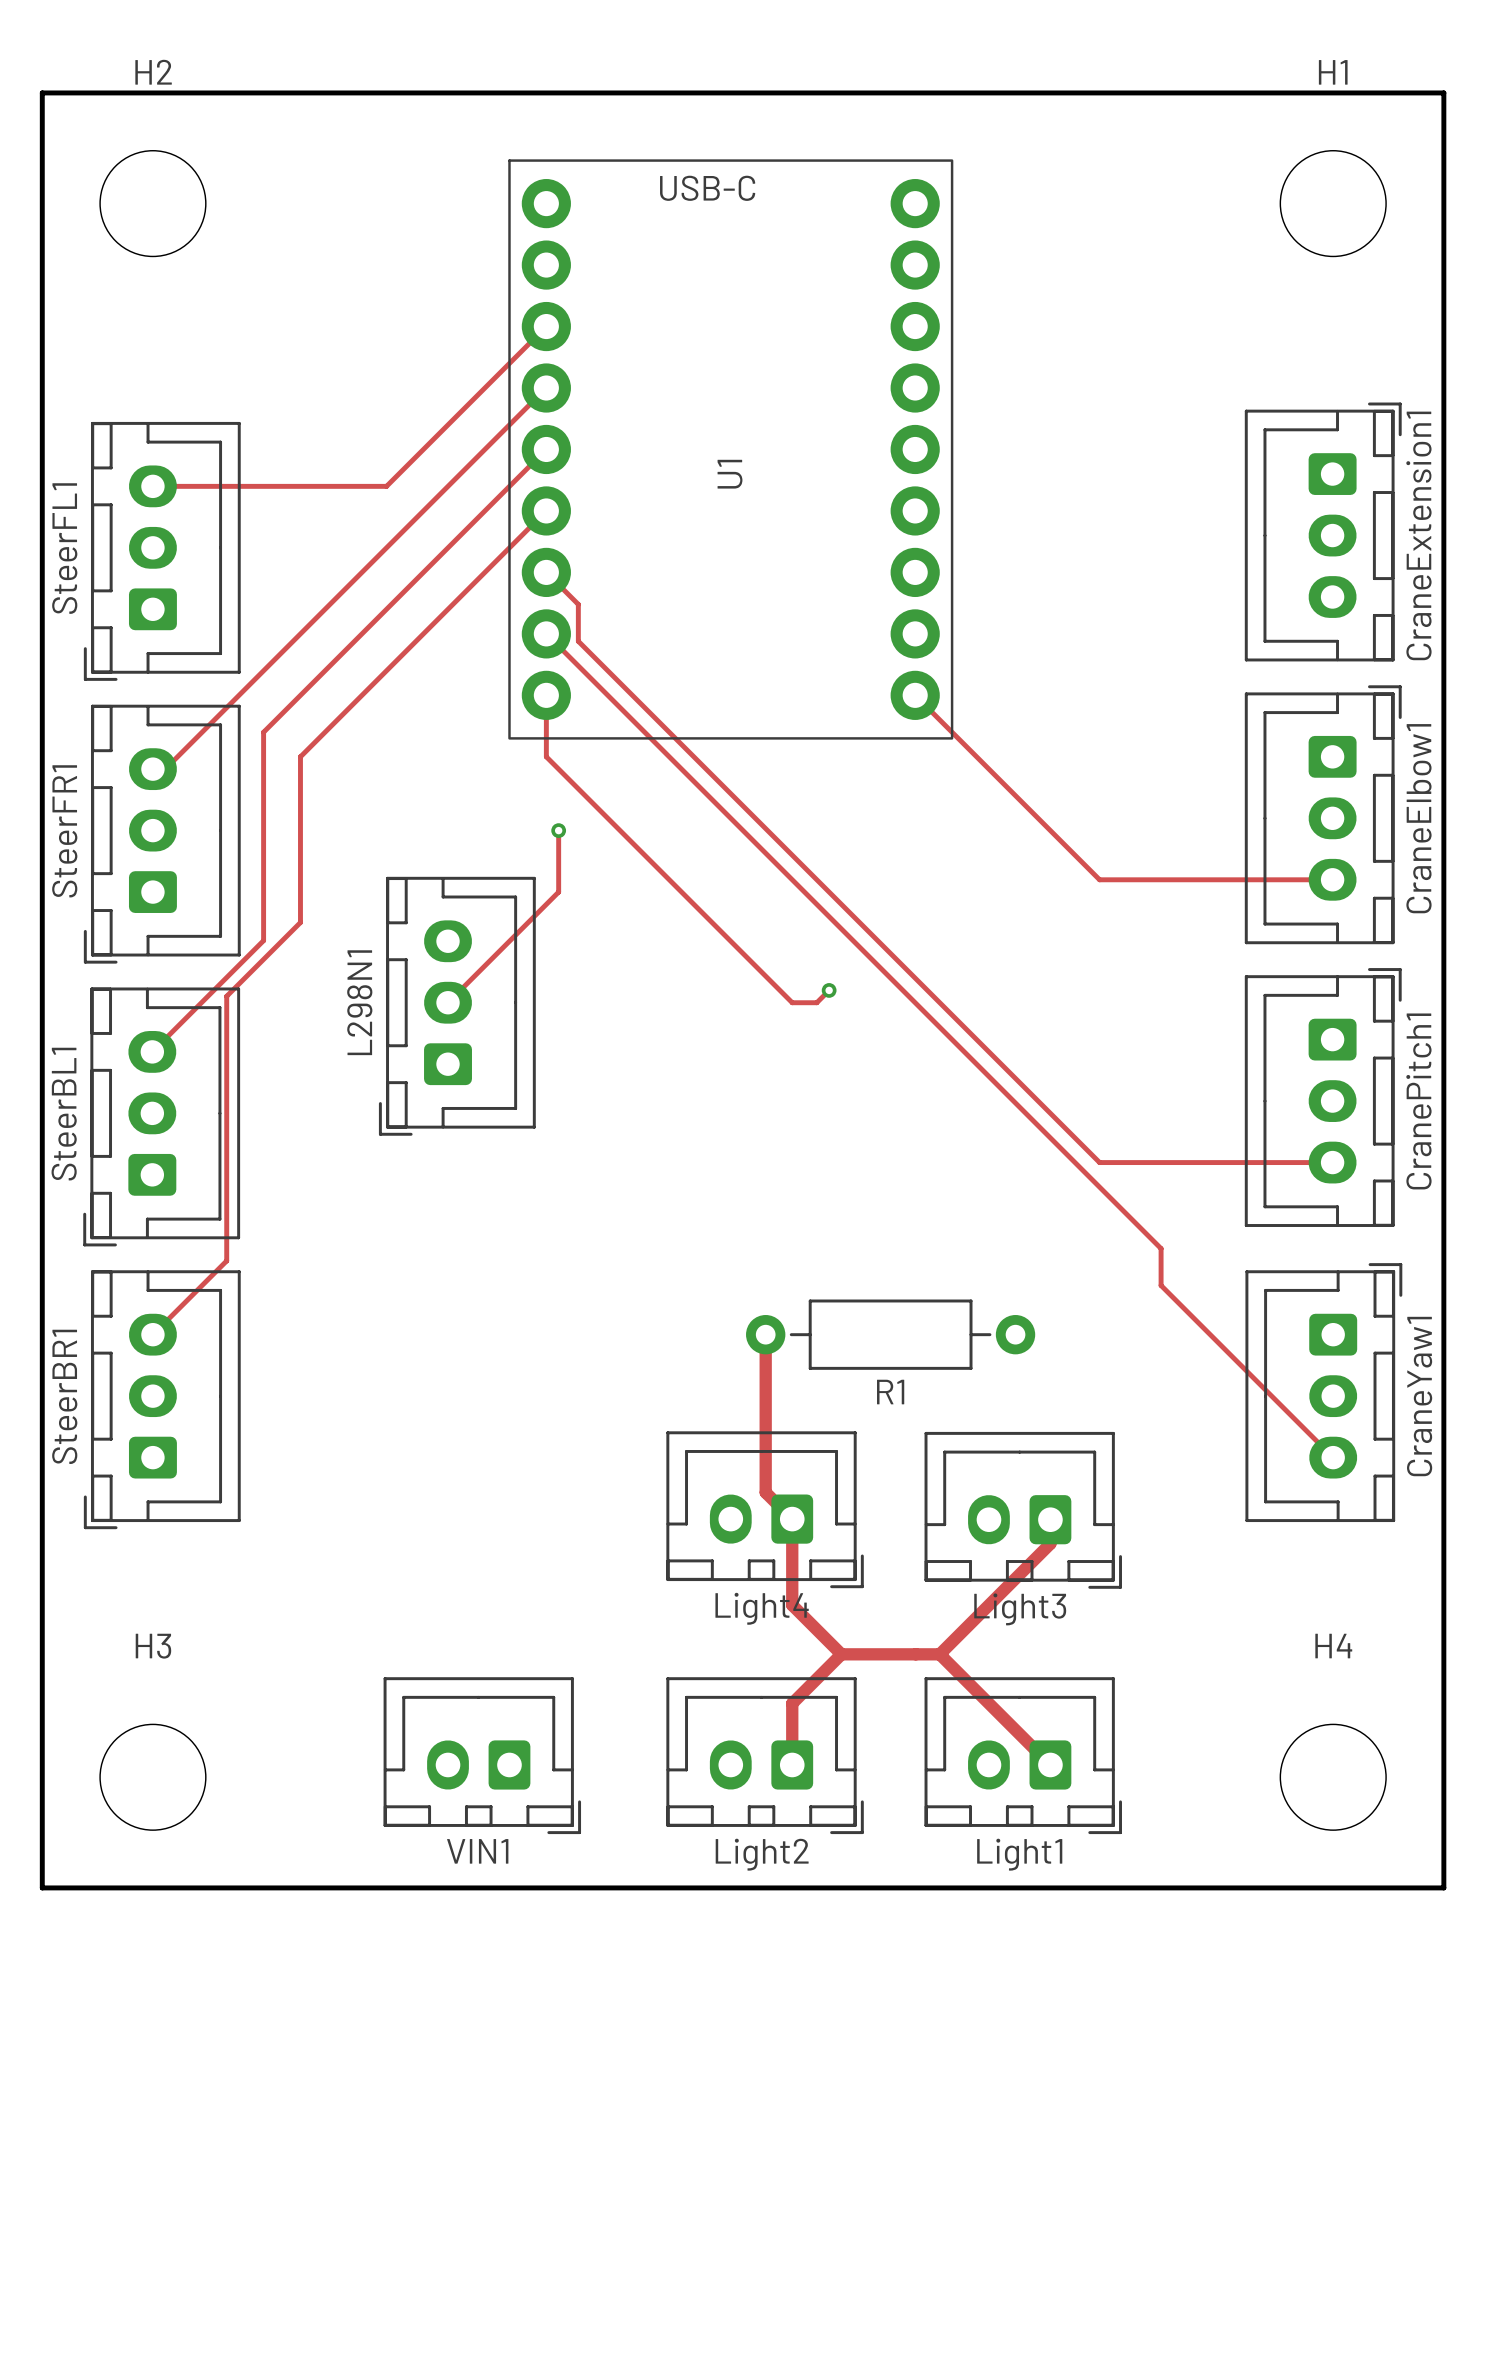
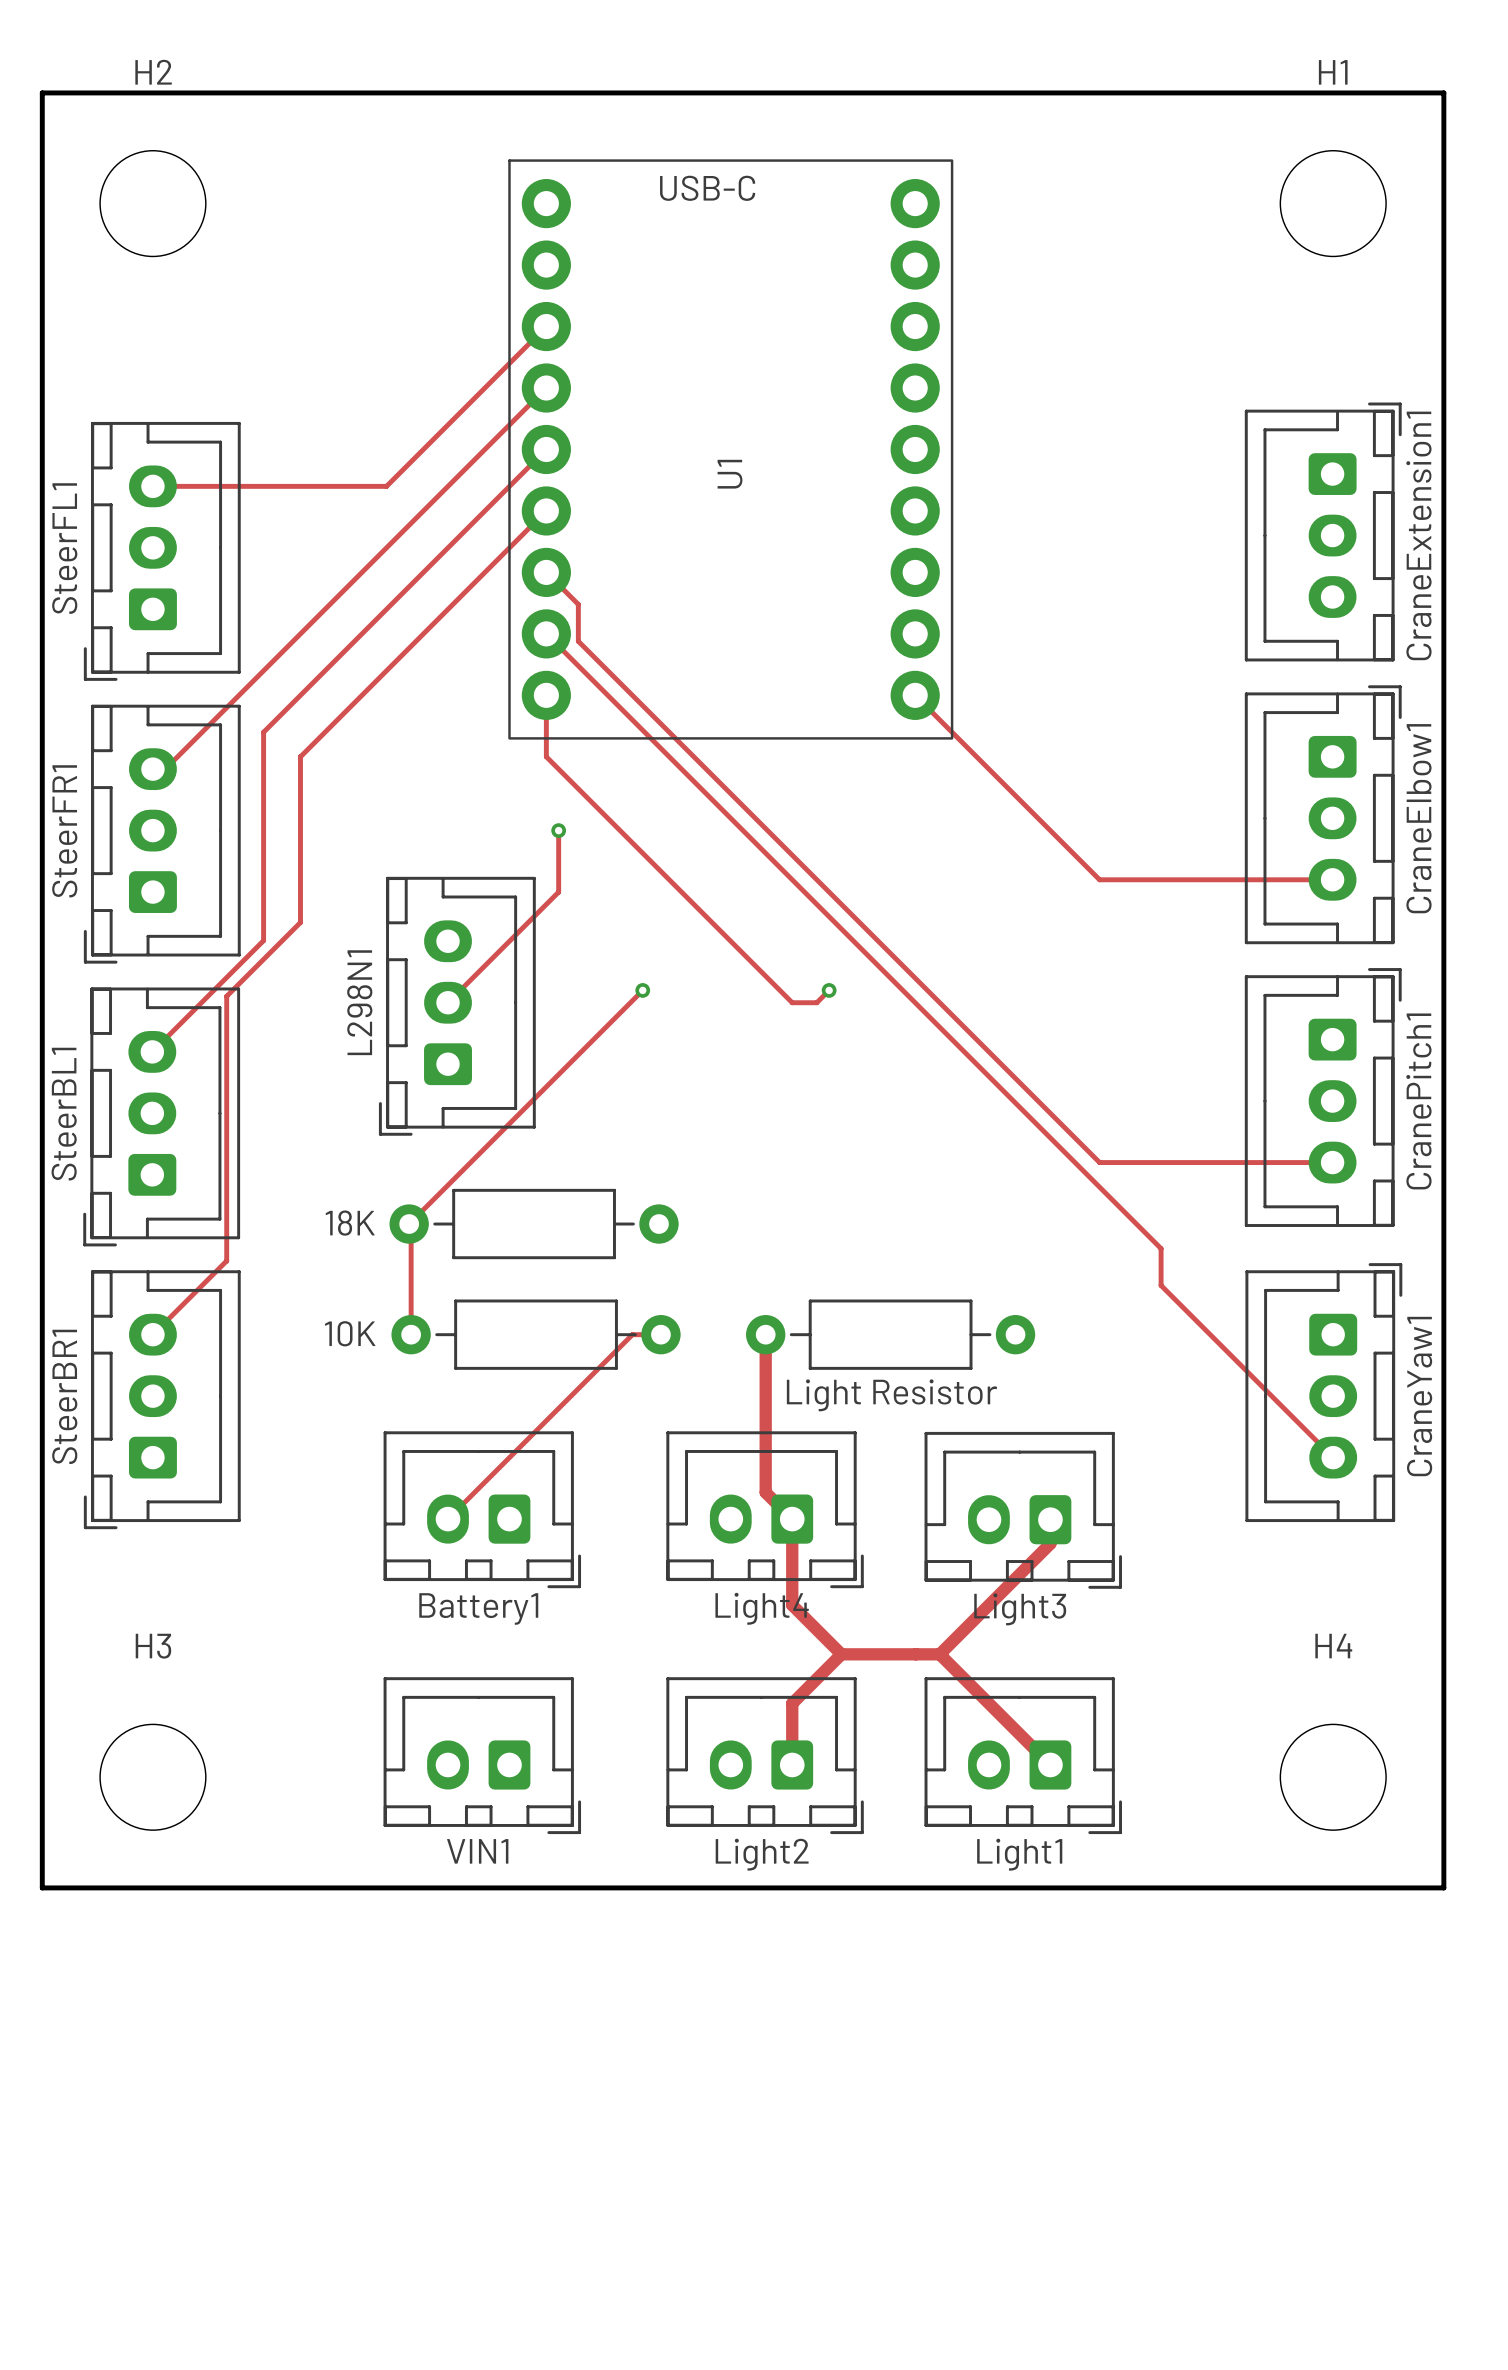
via: none -> (642, 990)
track: none -> (644, 990) (409, 1224) (411, 1225) (411, 1334)
18K: none -> (534, 1224)
10K: none -> (536, 1334)
track: none -> (660, 1334) (632, 1334) (448, 1519)
R1 name: R1 (890, 1392) -> Light Resistor (892, 1395)
Battery1: none -> (482, 1509)

